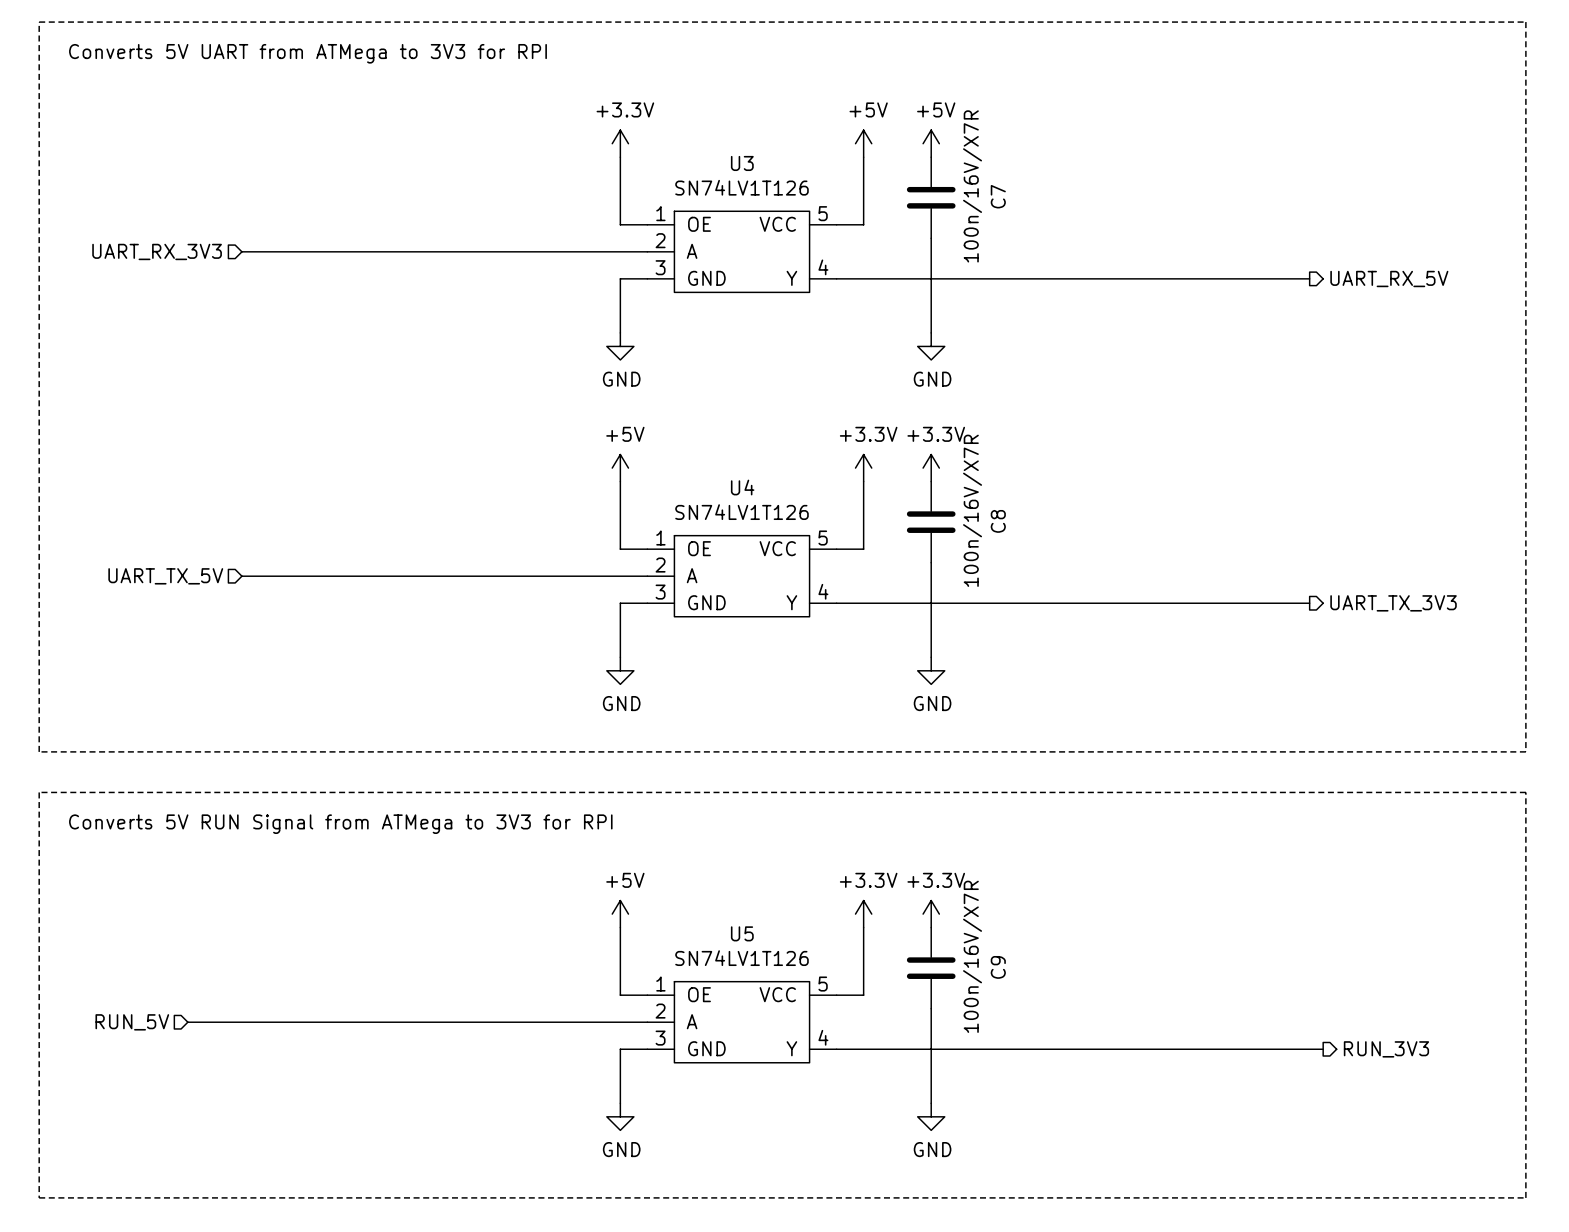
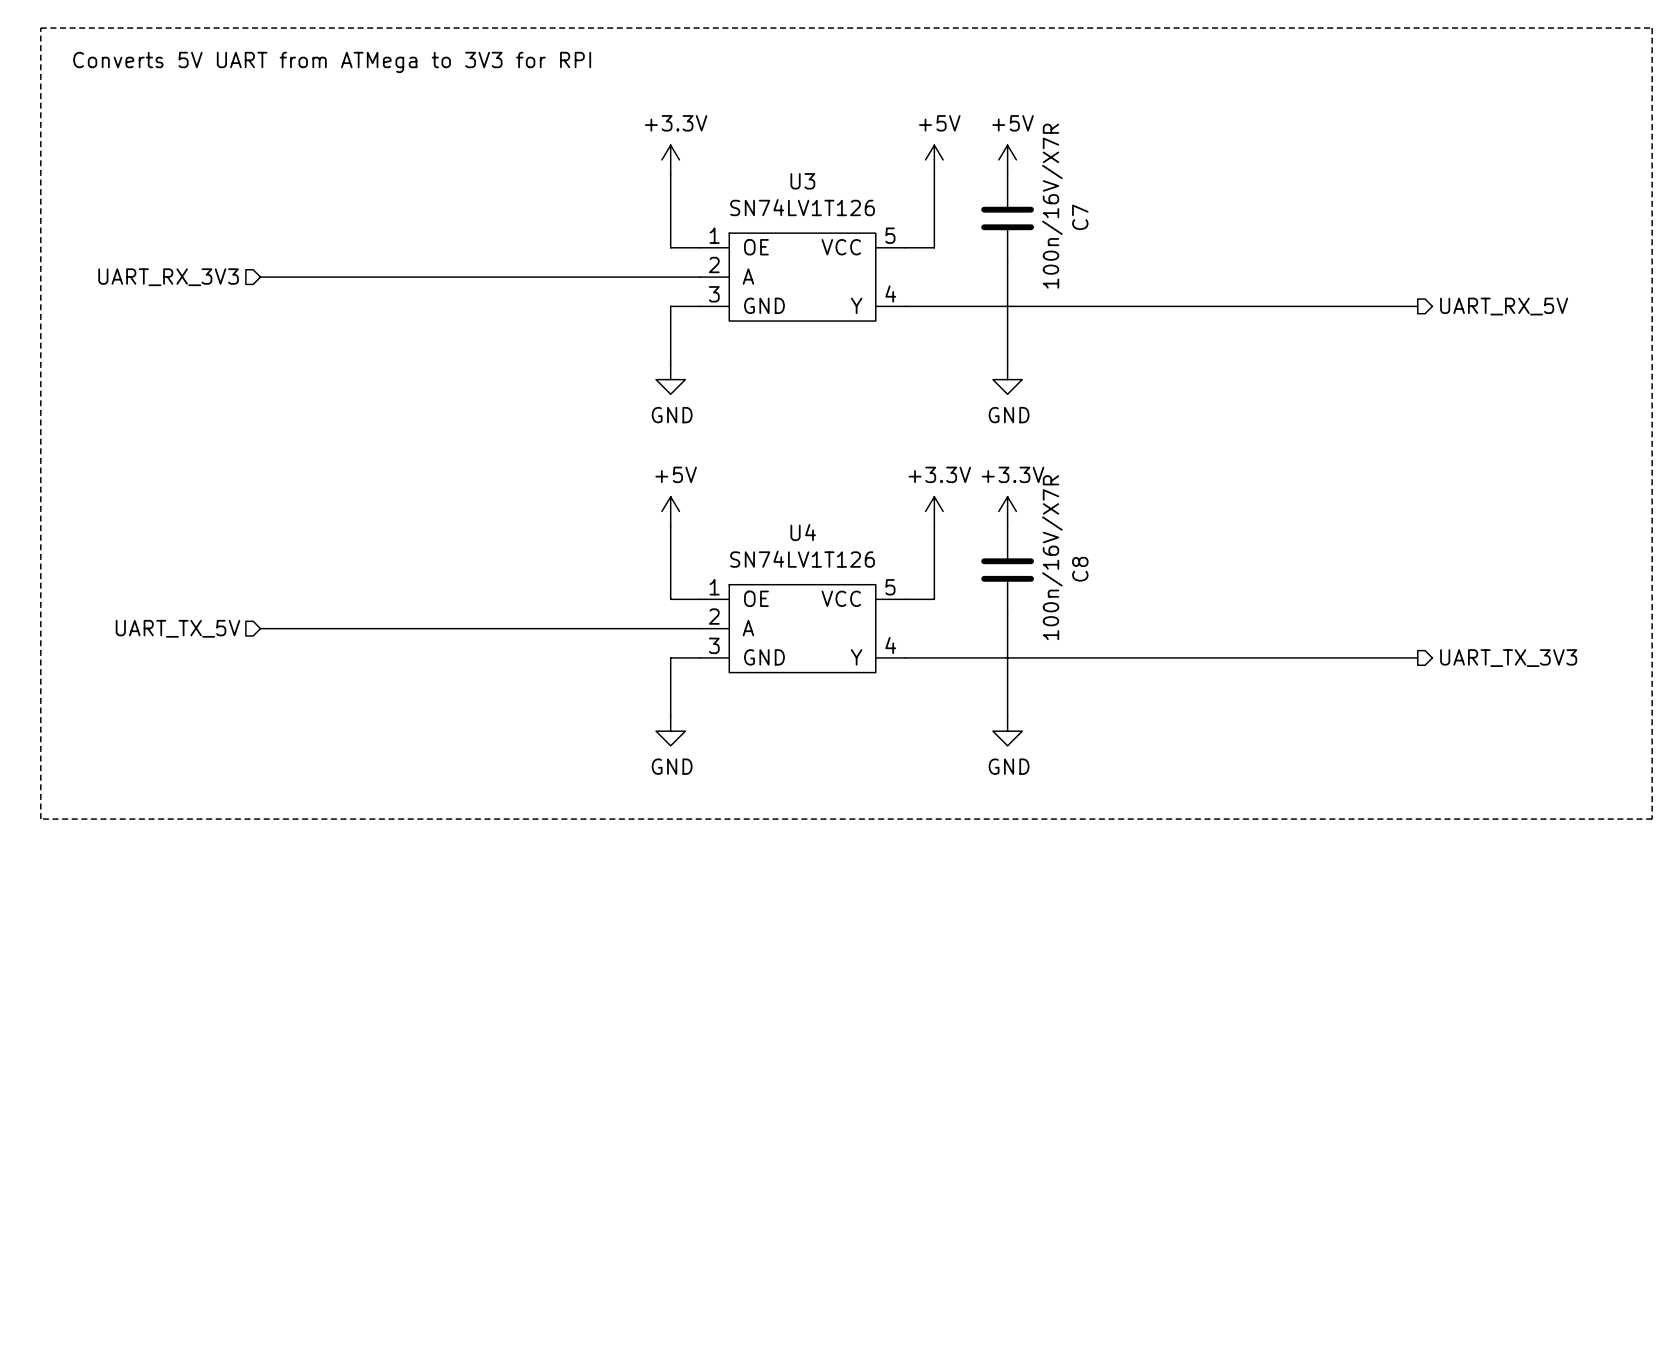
line: (39, 792) (1525, 792) (1525, 1197) (39, 1197) (39, 792) -> none
text: Converts 5V RUN Signal from ATMega to 3V3 for RPI (340, 824) -> none
power symbol: +5V (620, 914) -> none
power symbol: +3.3V (863, 914) -> none
power symbol: +3.3V (931, 914) -> none
wire: (620, 927) (620, 995) (647, 995) -> none
wire: (863, 927) (863, 995) (836, 995) -> none
C9: 100n/16V/X7R (931, 968) -> none
wire: (931, 1008) (931, 1103) -> none
hierarchical label: RUN_5V (132, 1022) -> none
wire: (187, 1022) (647, 1022) -> none
U5: SN74LV1T126 (741, 1022) -> none
wire: (647, 1049) (620, 1049) (620, 1103) -> none
wire: (836, 1049) (1323, 1049) -> none
hierarchical label: RUN_3V3 (1386, 1049) -> none
power symbol: GND (620, 1116) -> none
power symbol: GND (931, 1116) -> none

